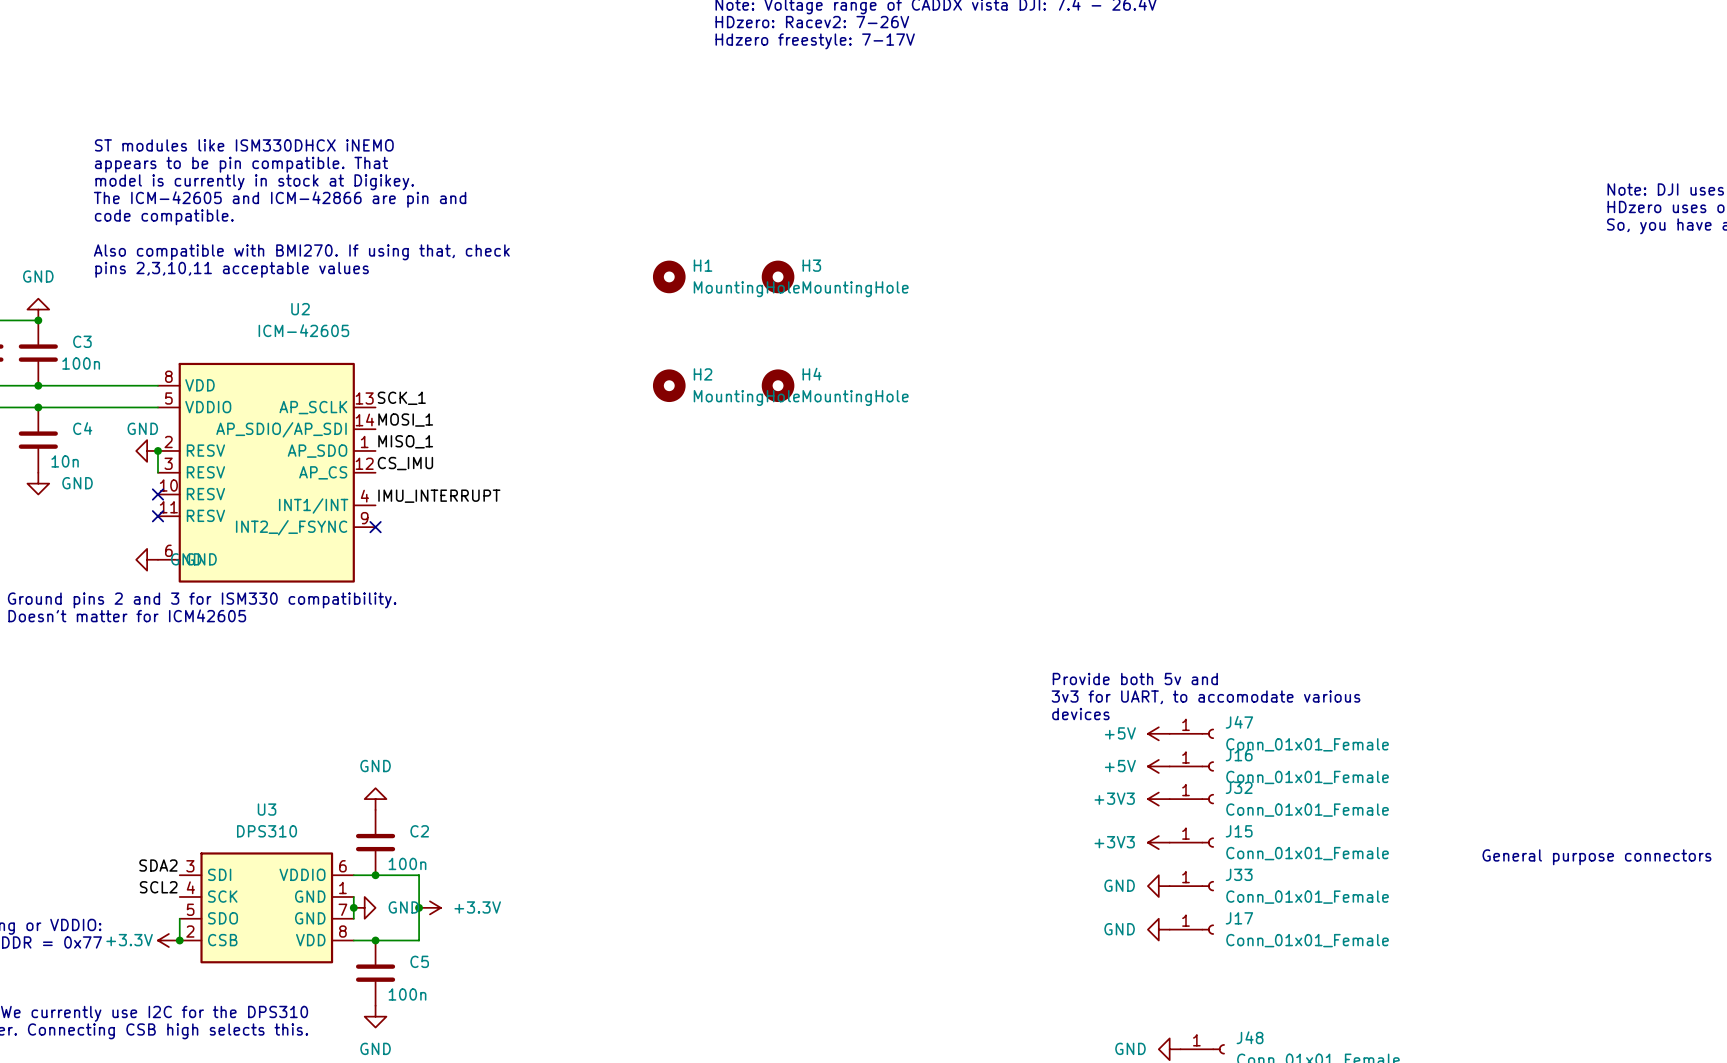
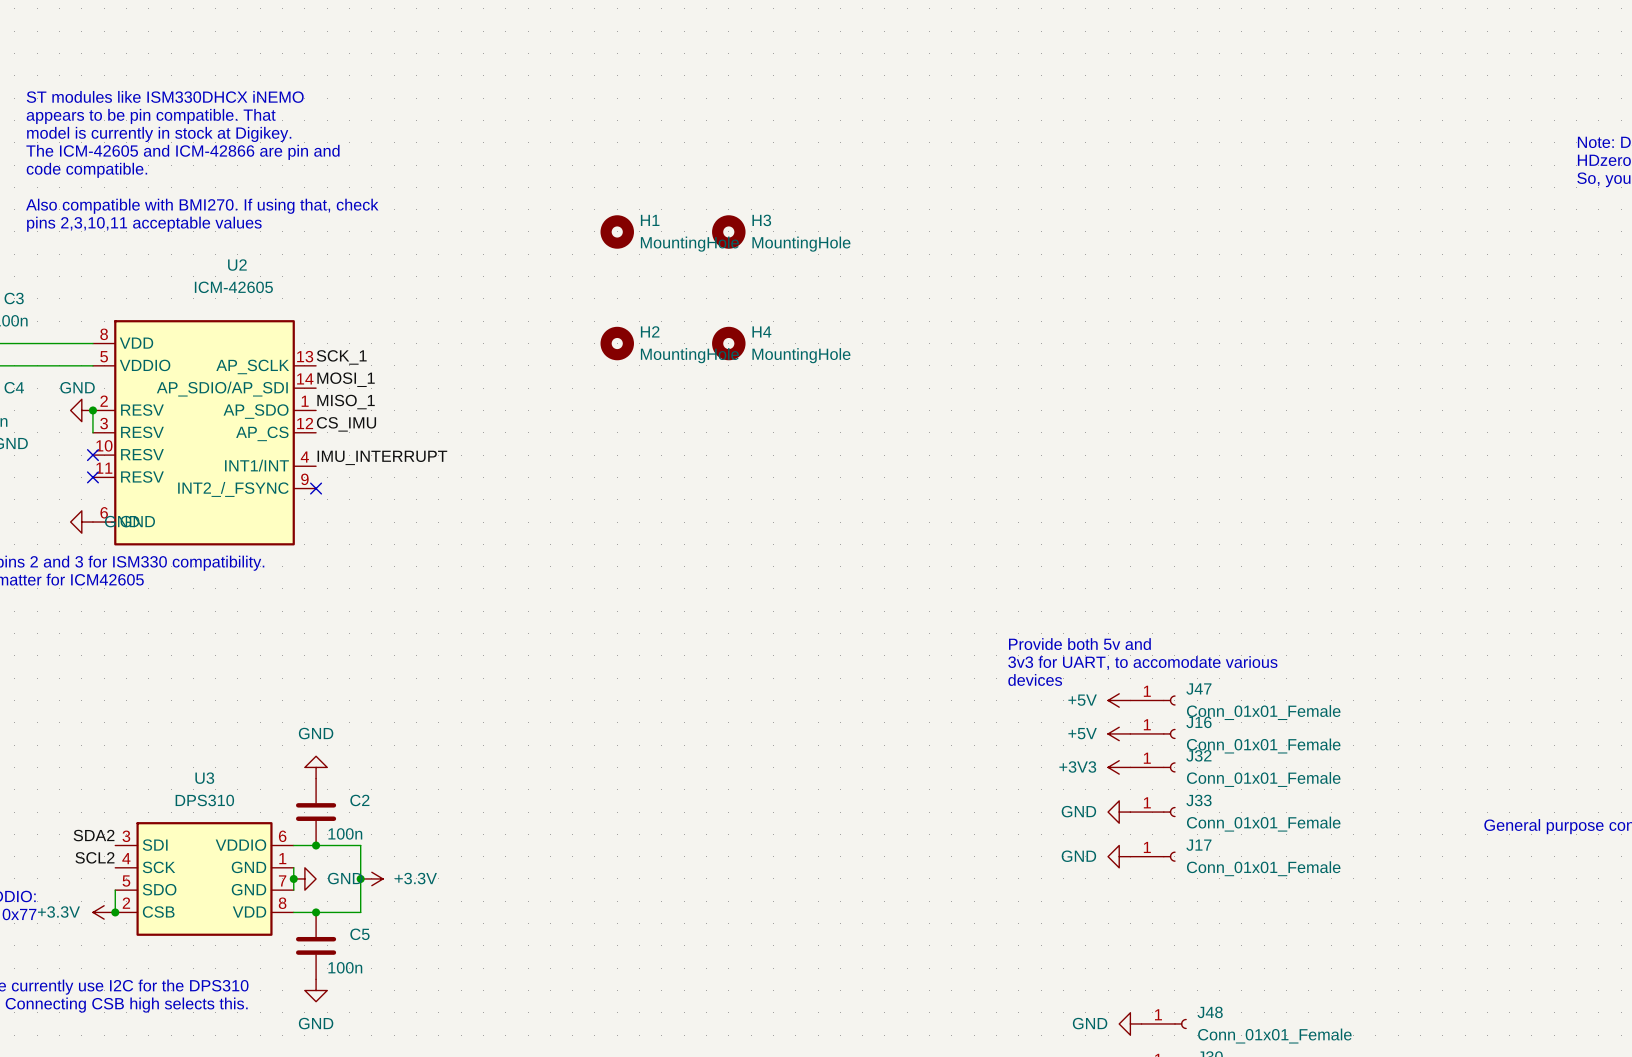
J15 name: J15 (1239, 831) -> J33 (1198, 800)
power symbol: +3V3 (1158, 842) -> GND (1119, 812)
J33 name: J33 (1239, 874) -> J17 (1198, 845)
power symbol: GND (1158, 929) -> none
J17: Conn_01x01_Female (1191, 929) -> none

